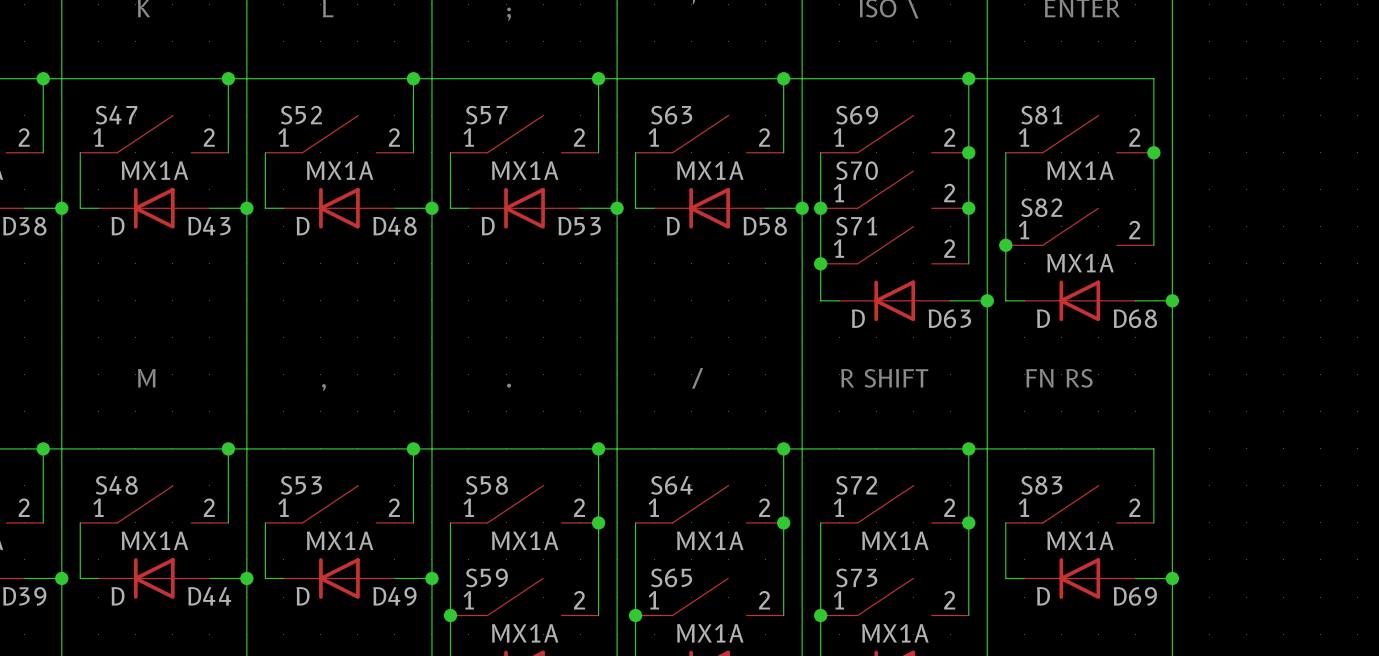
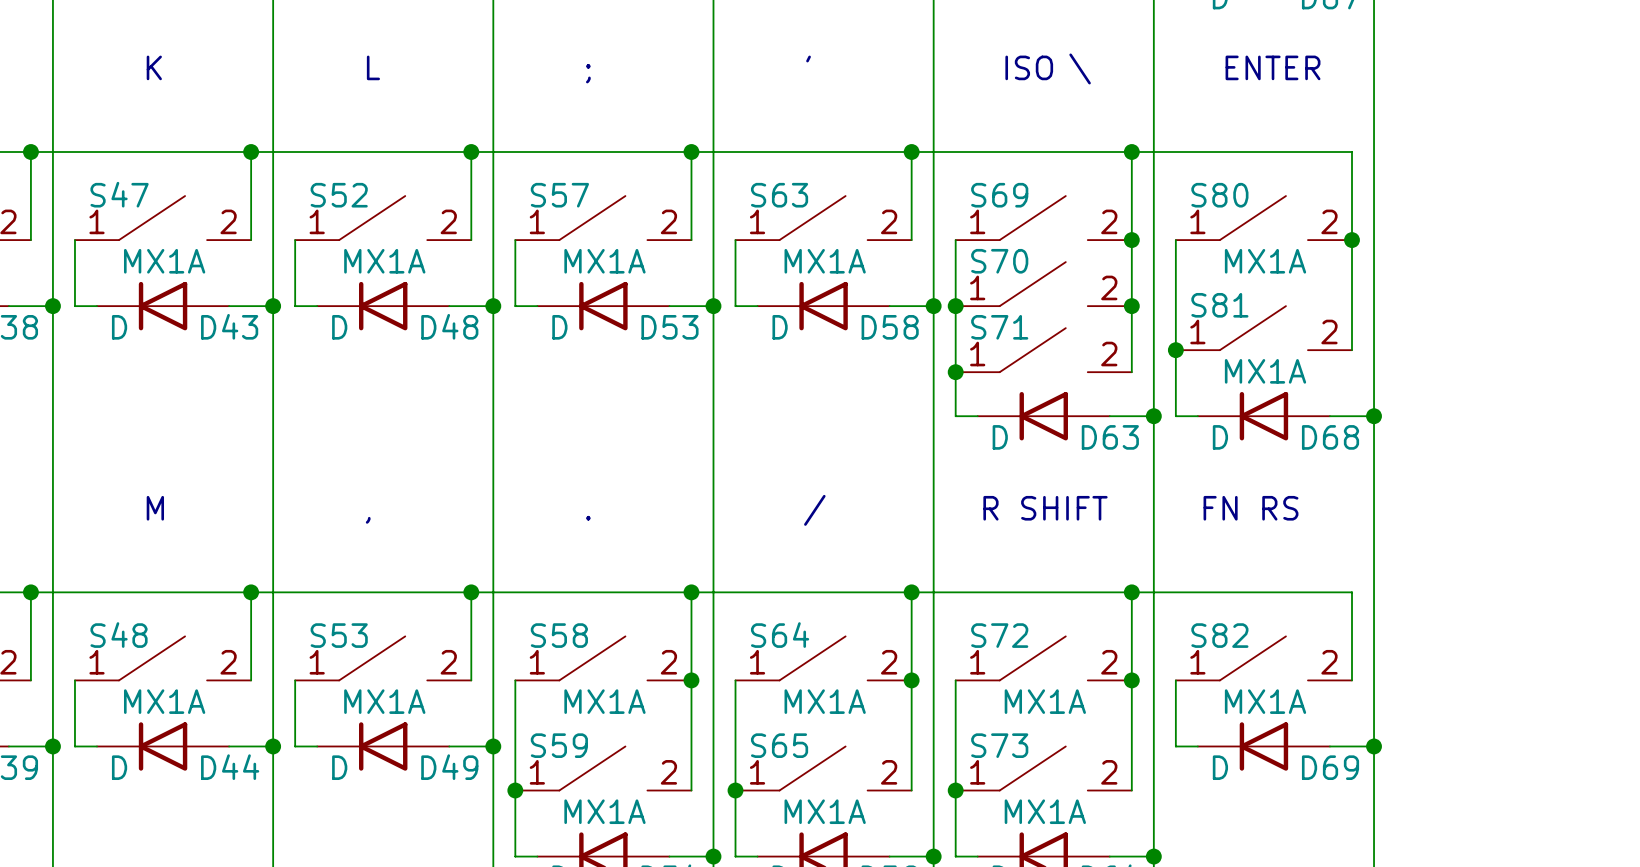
S81 name: S81 (1041, 115) -> S80 (1219, 195)
S82 name: S82 (1041, 207) -> S81 (1219, 305)
S83 name: S83 (1041, 485) -> S82 (1219, 635)

